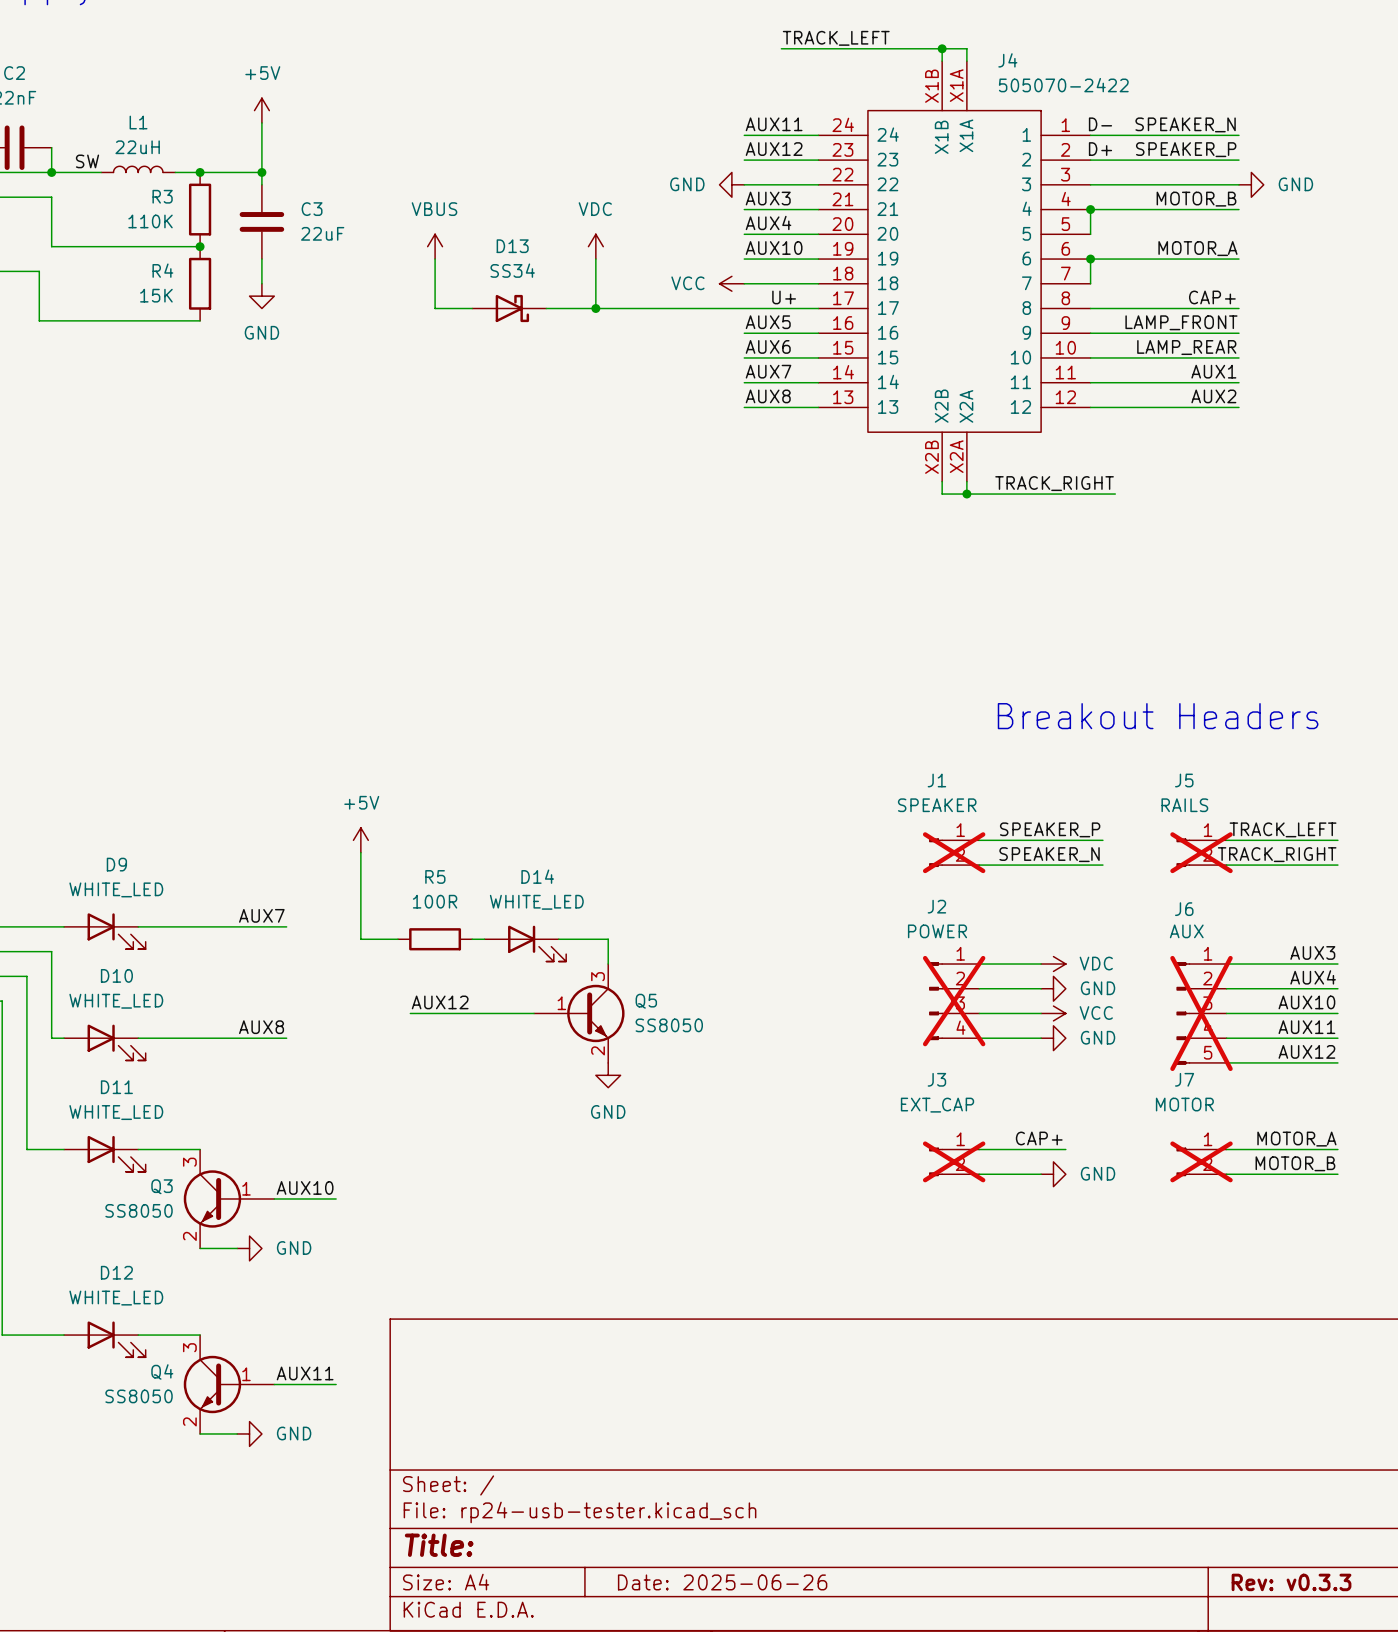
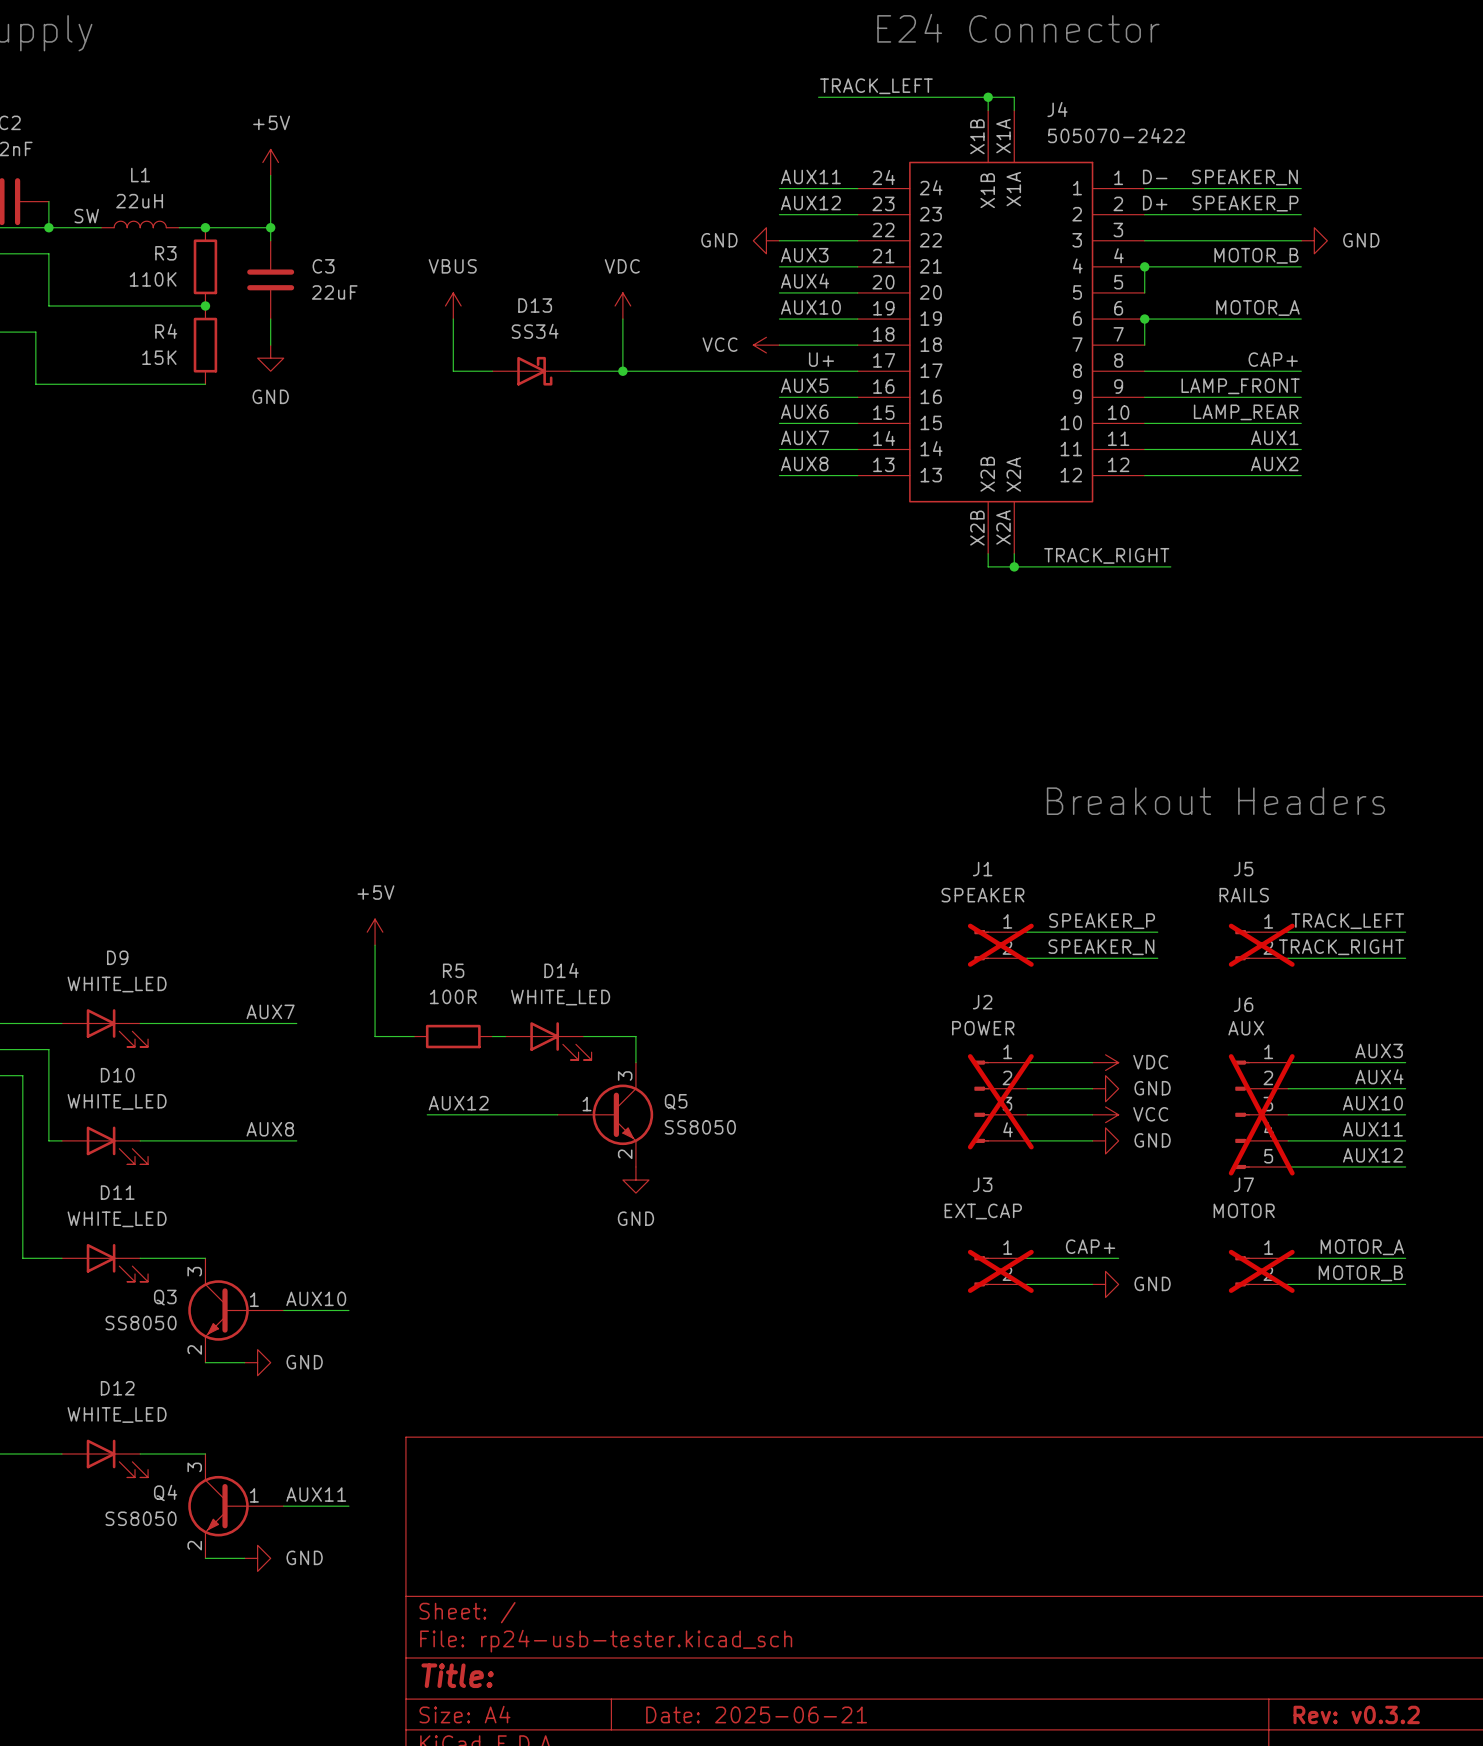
title block: Date: 2025-06-26 (722, 1582) -> Date: 2025-06-21 (756, 1714)
title block: Rev: v0.3.3 (1291, 1582) -> Rev: v0.3.2 (1356, 1714)

